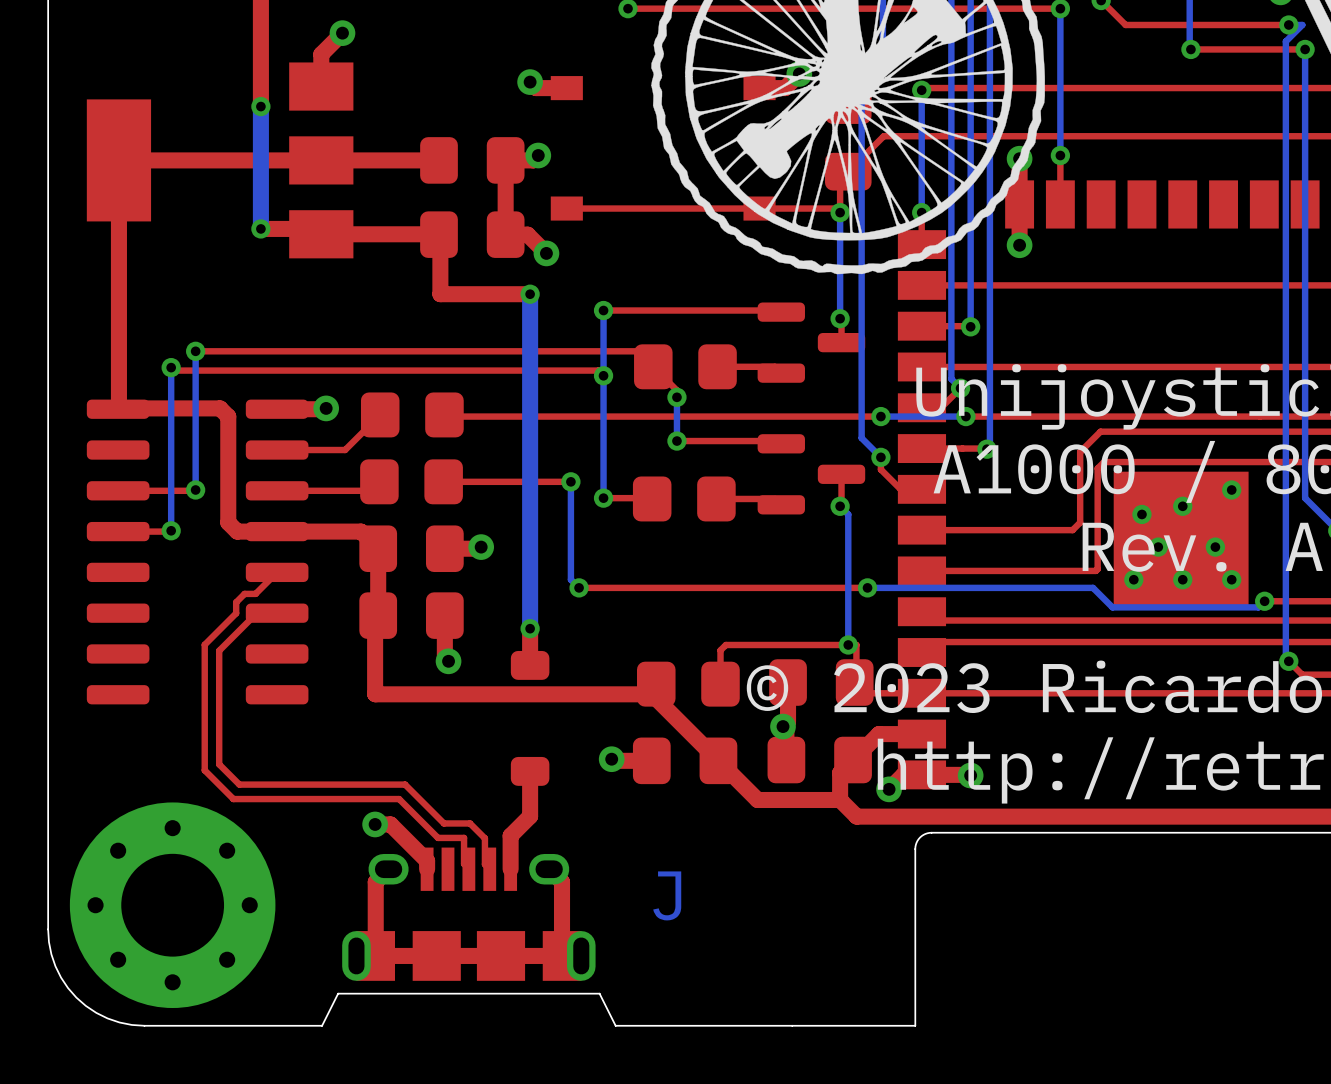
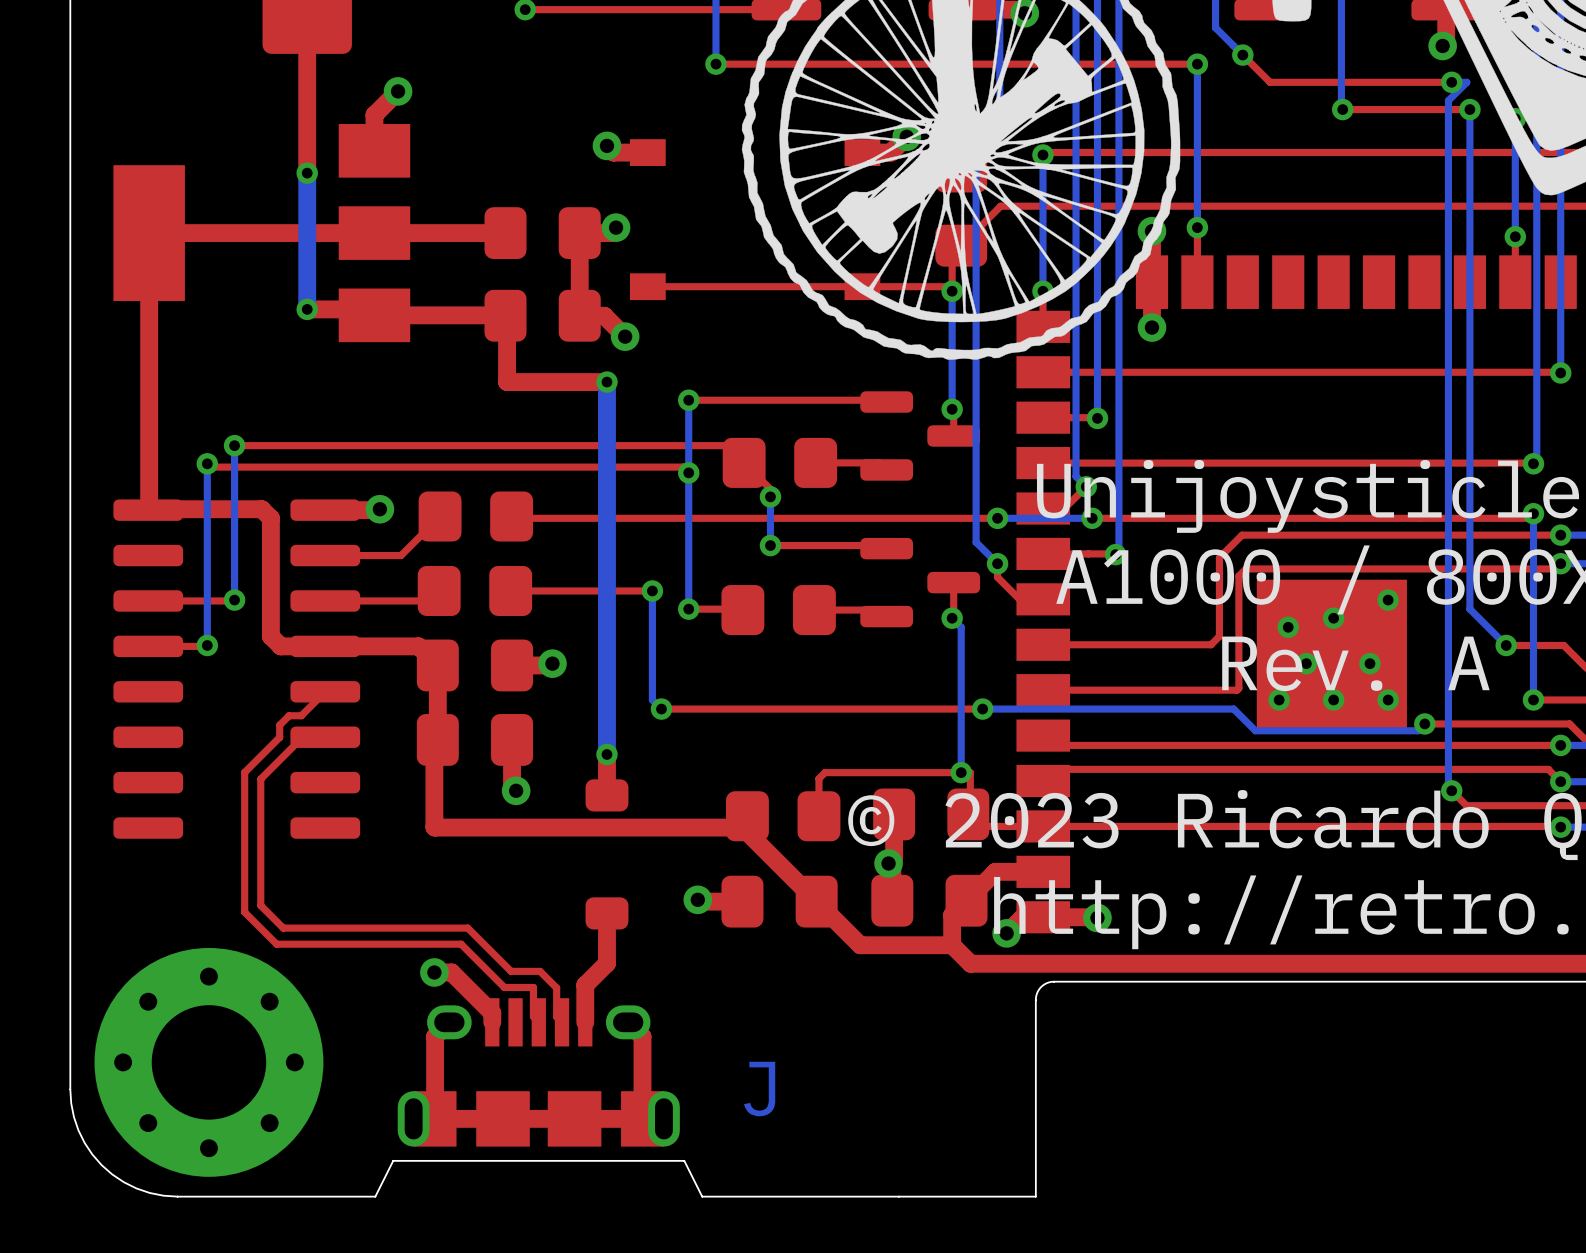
text position: J (667, 895) -> J (759, 1089)

